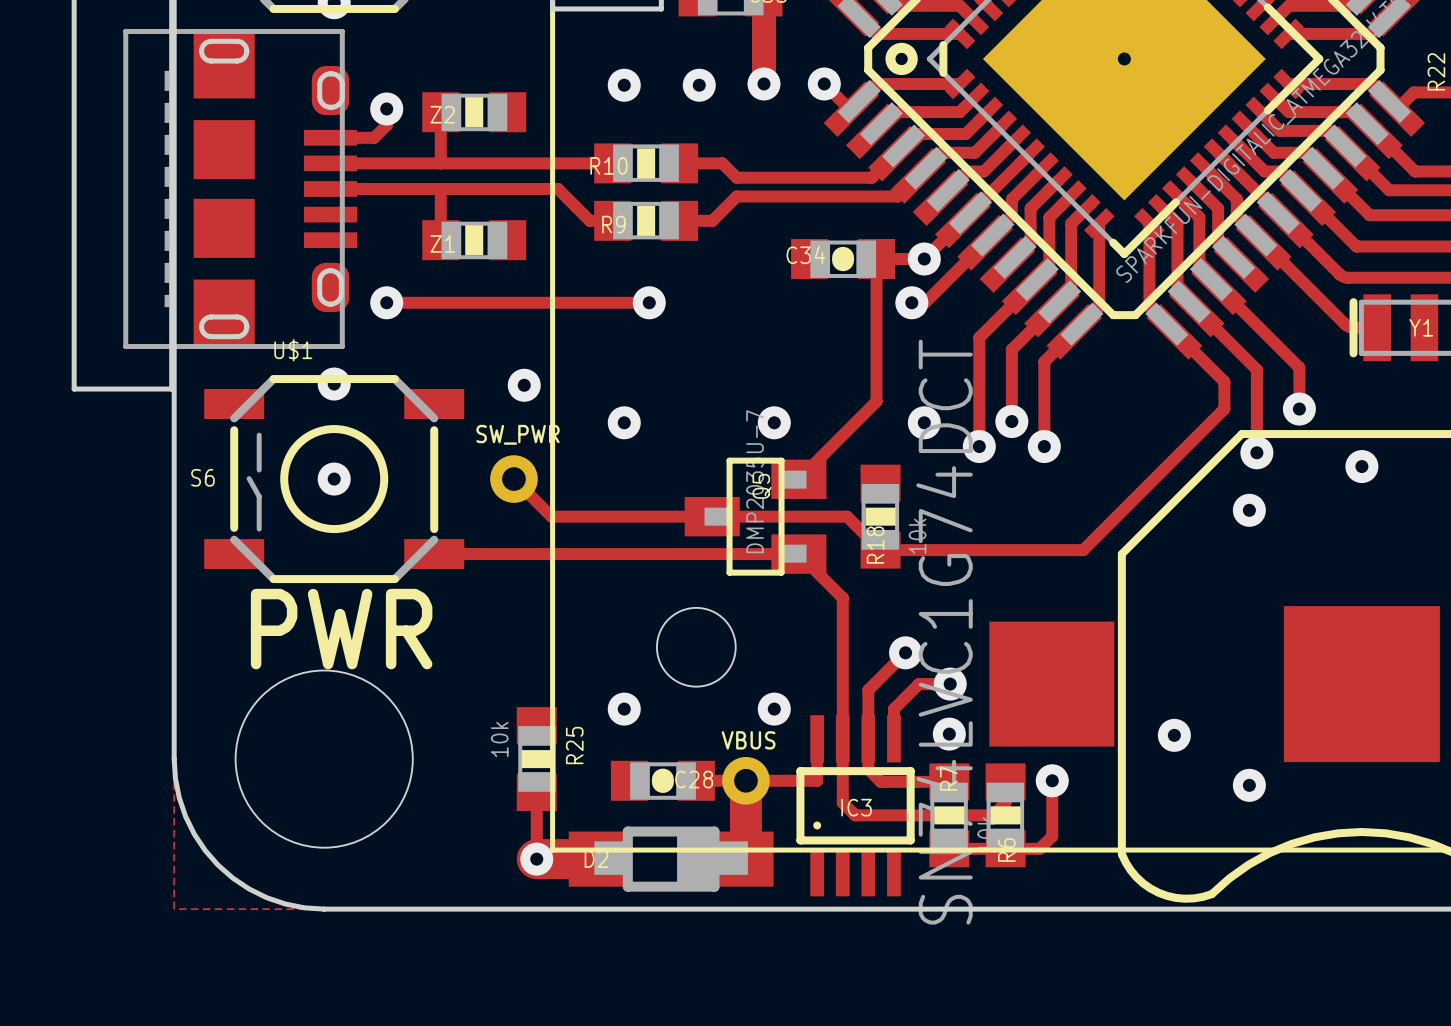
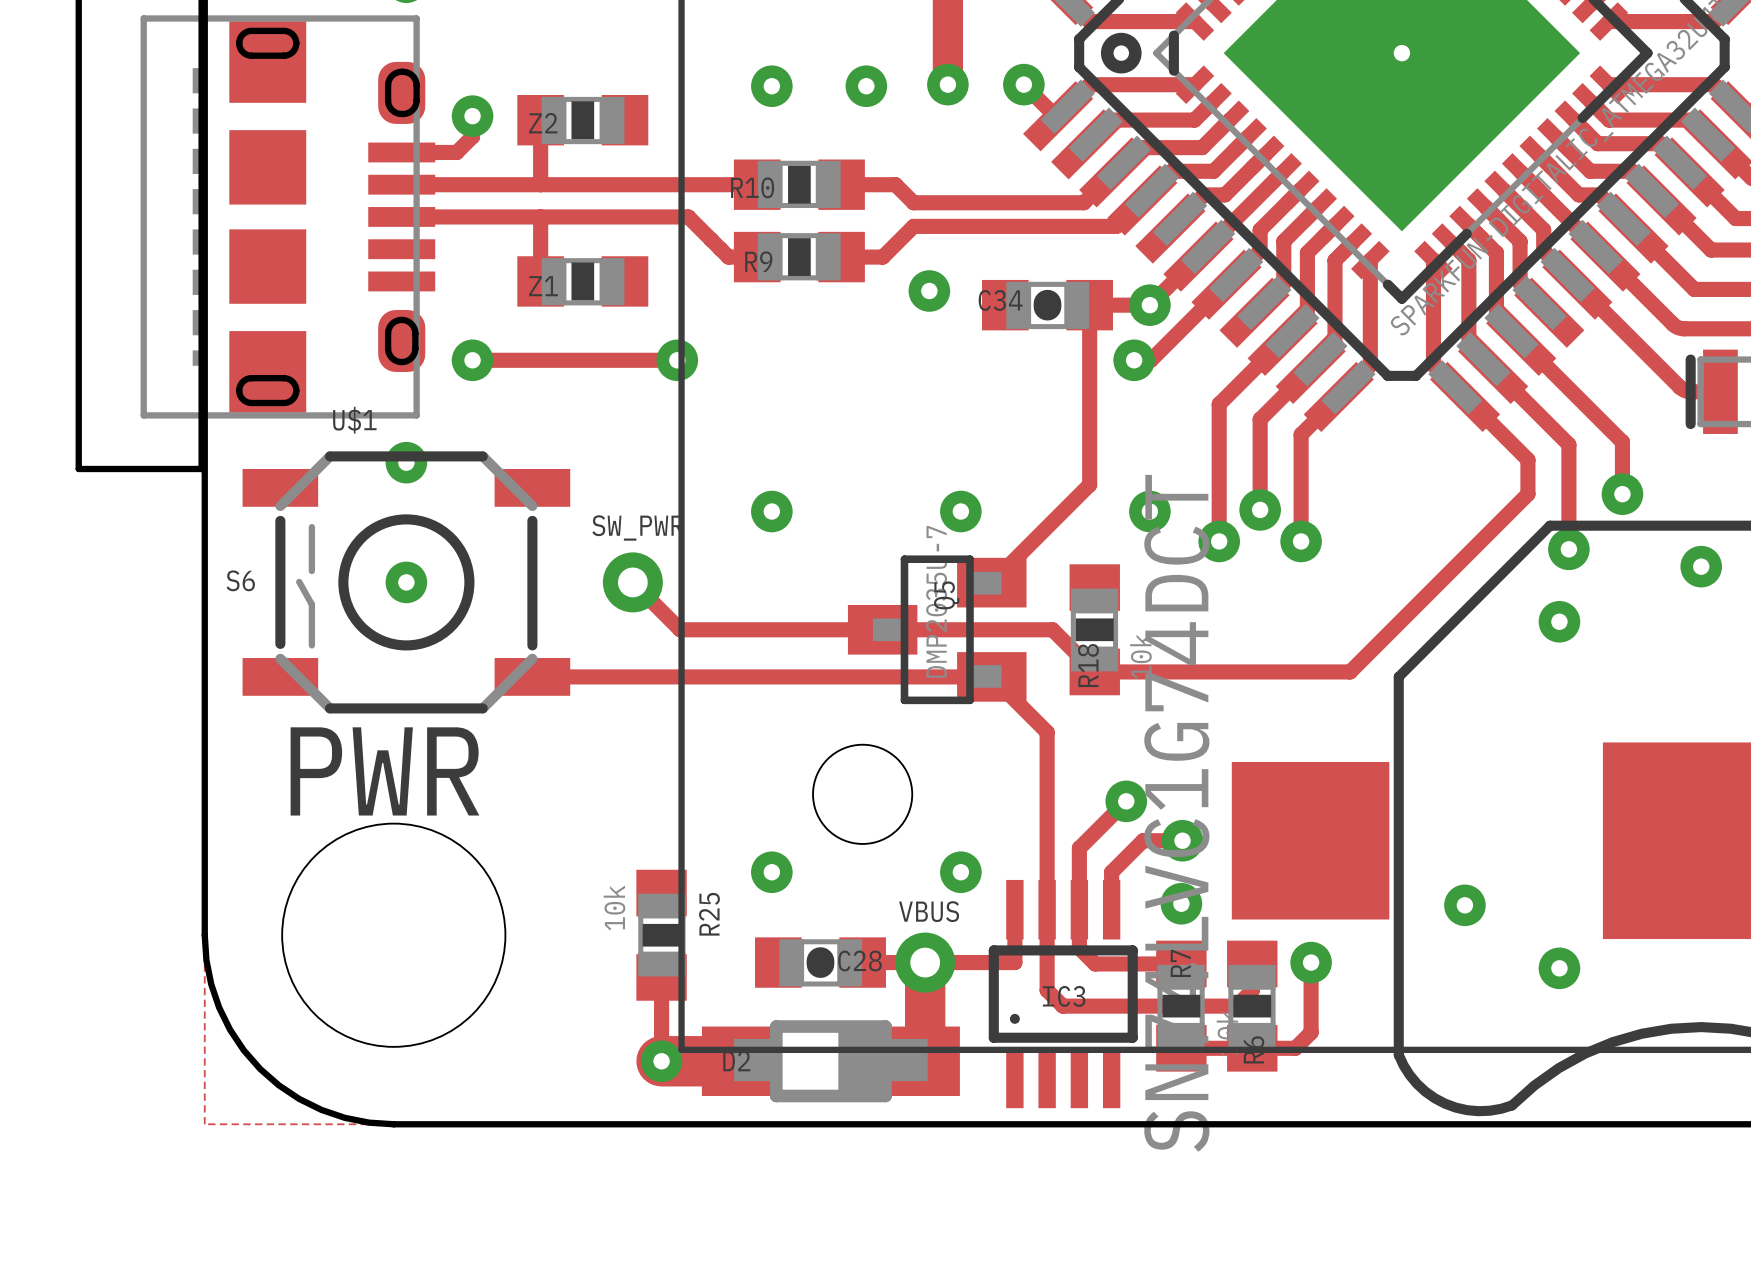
via: none -> (929, 290)
track: (549, 302) (649, 302) -> none
via: none -> (677, 360)
via: (649, 302) -> none
via: (524, 385) -> none

